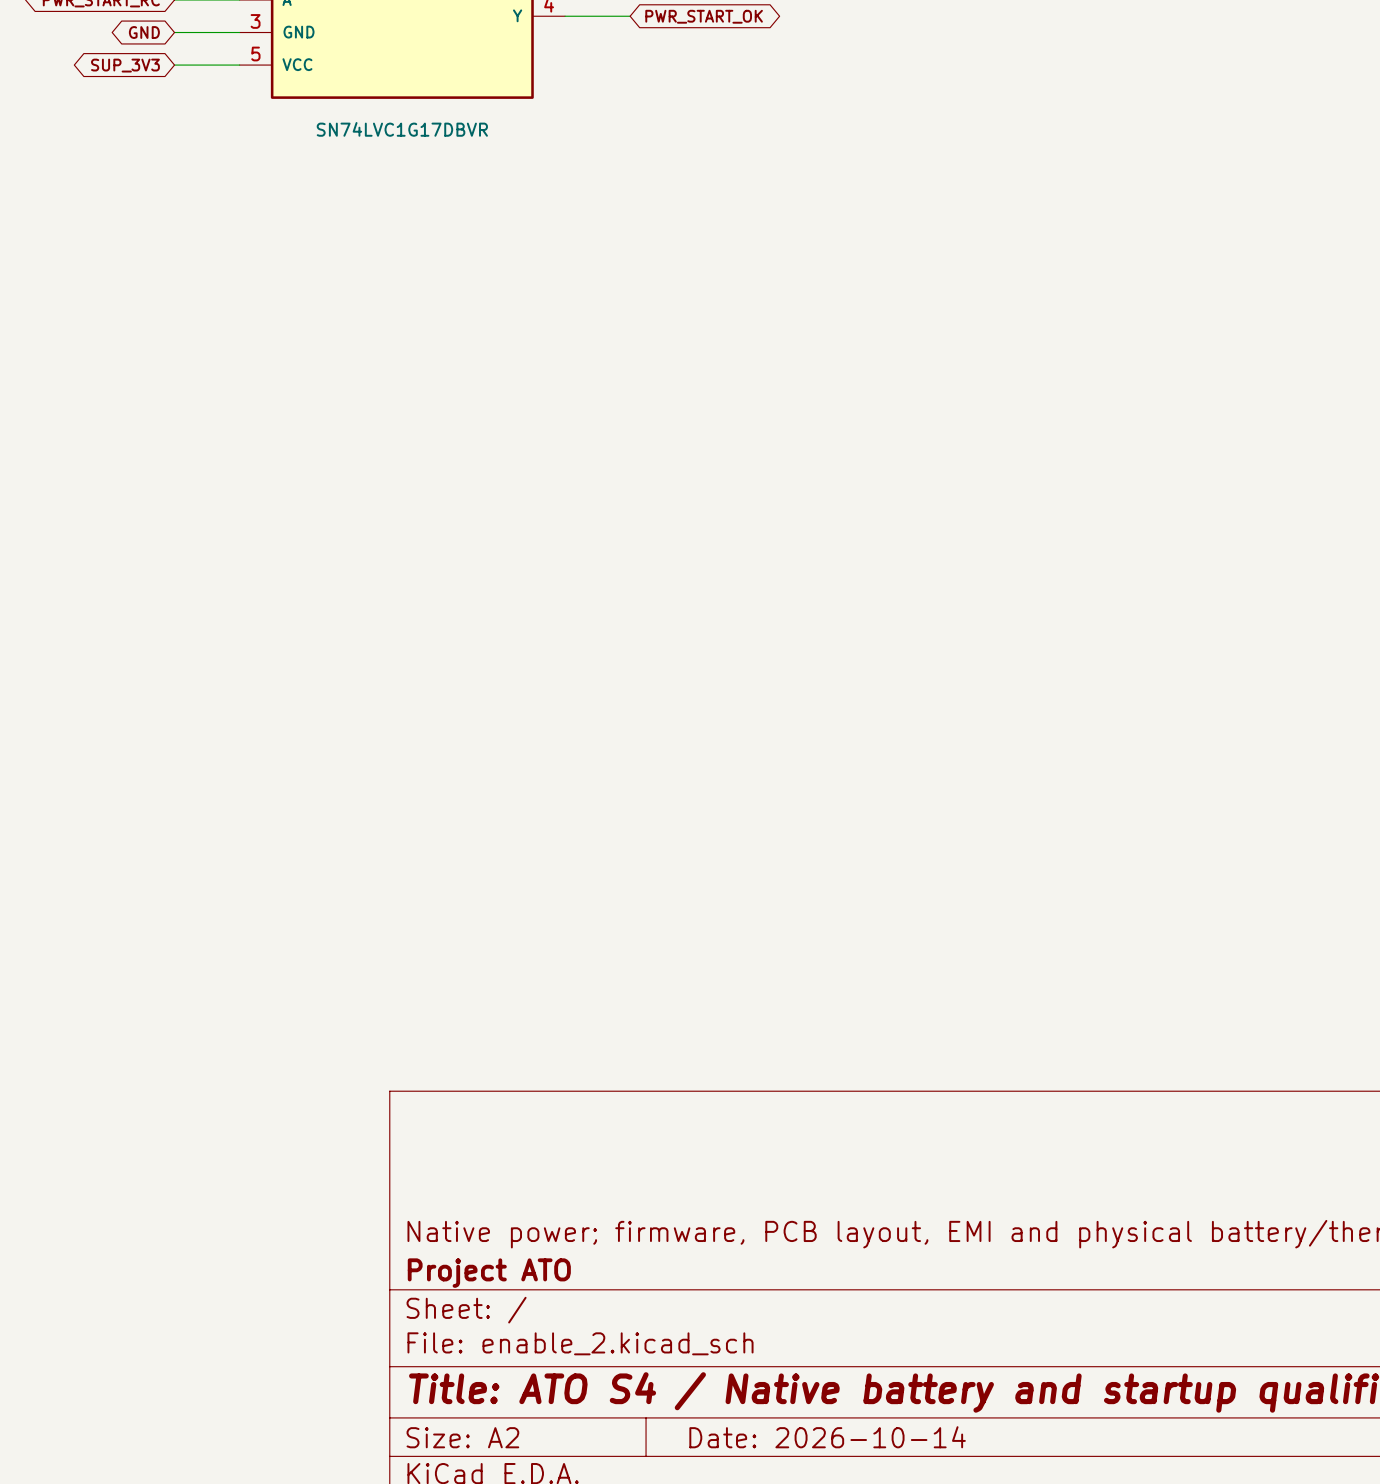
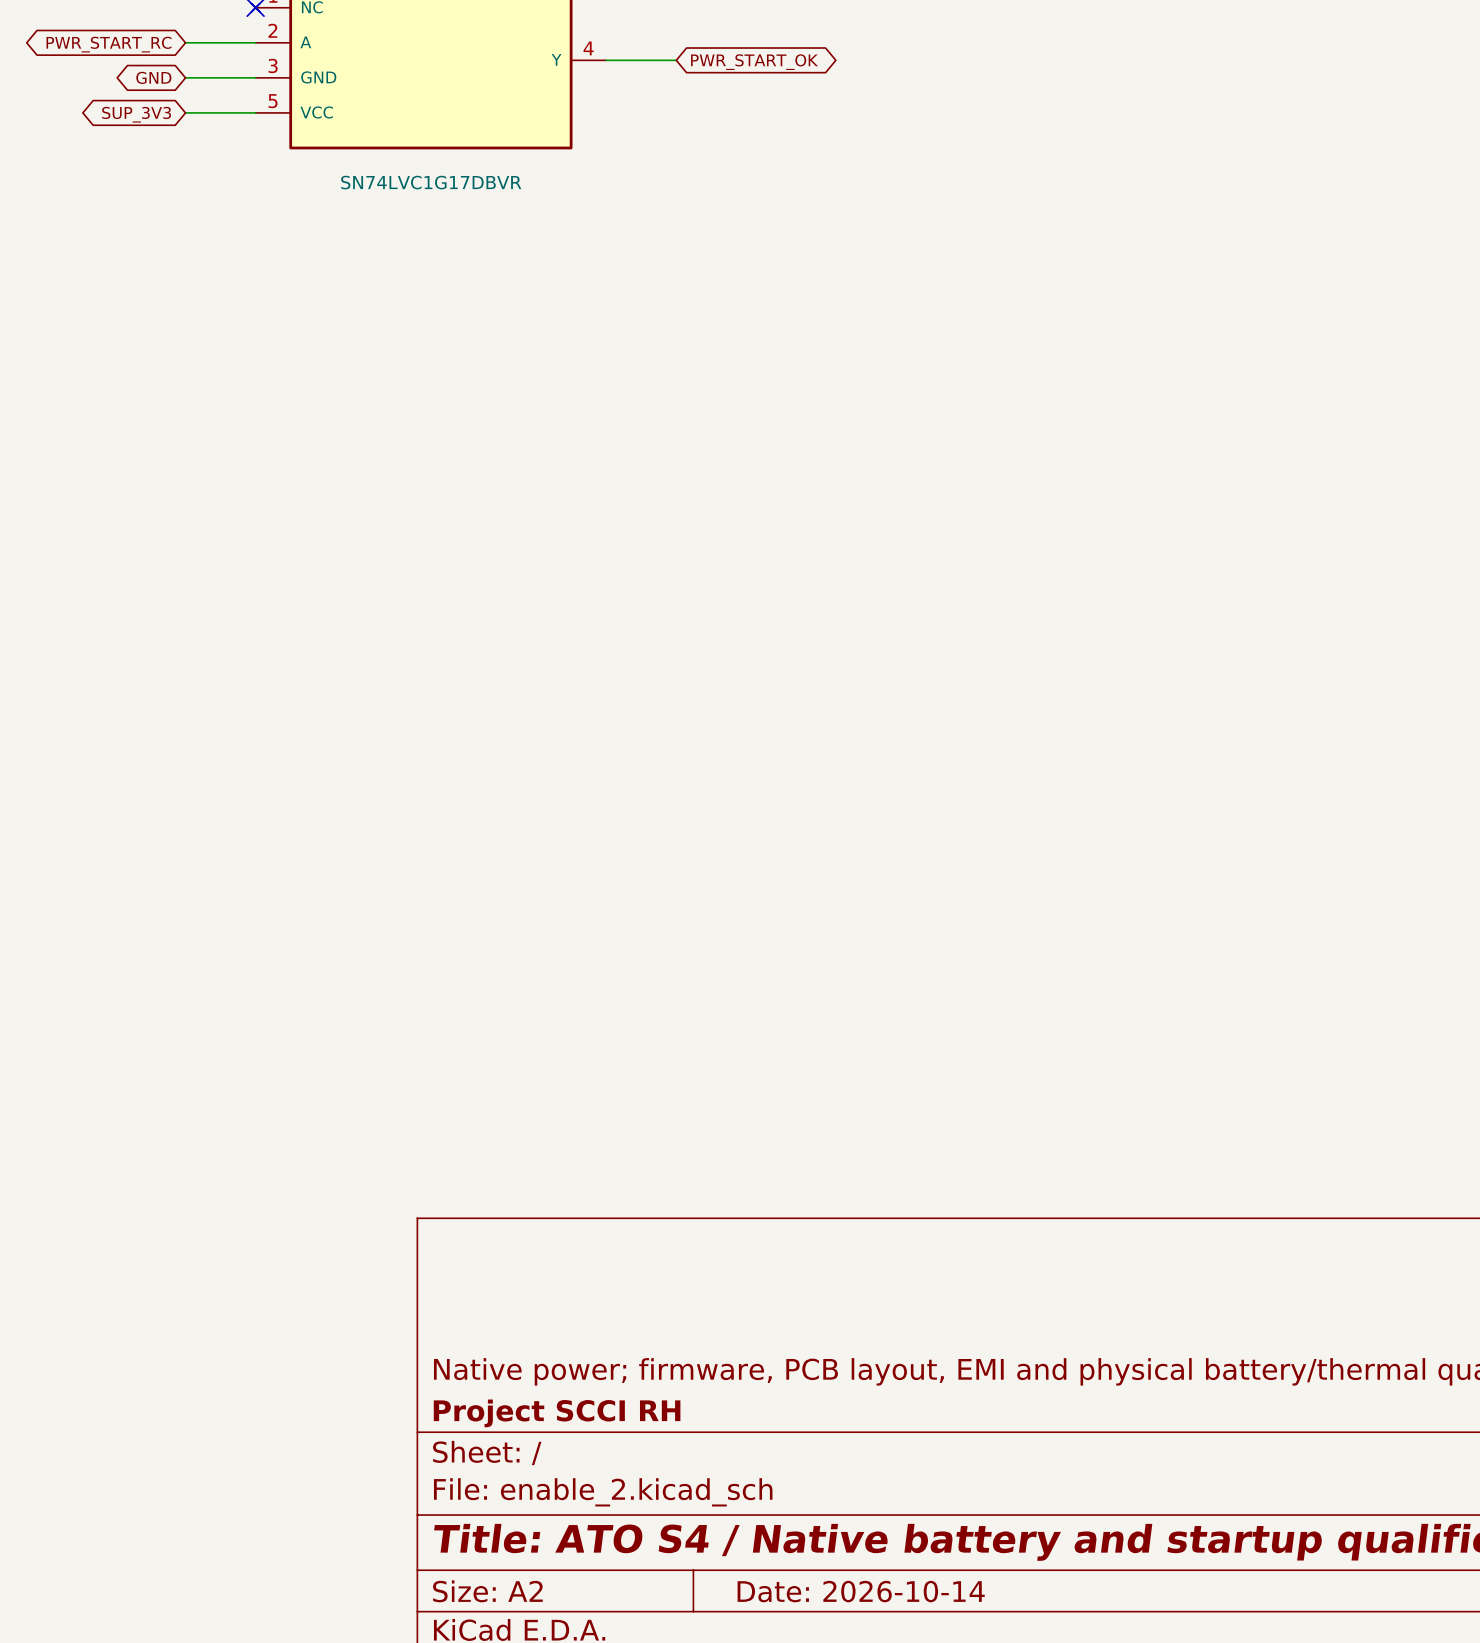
title block: Project ATO (489, 1273) -> Project SCCI RH (557, 1413)

